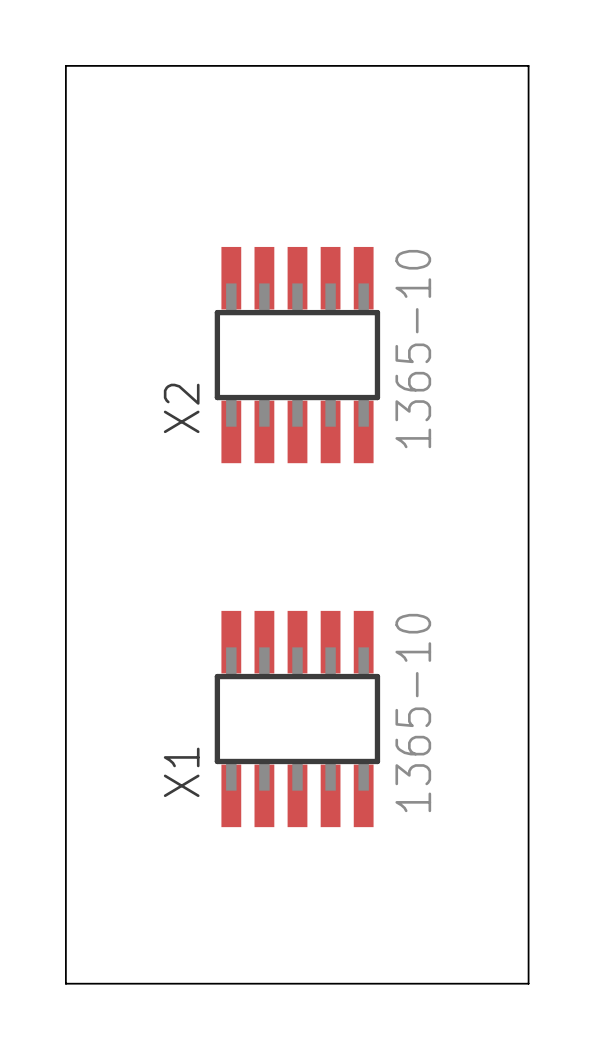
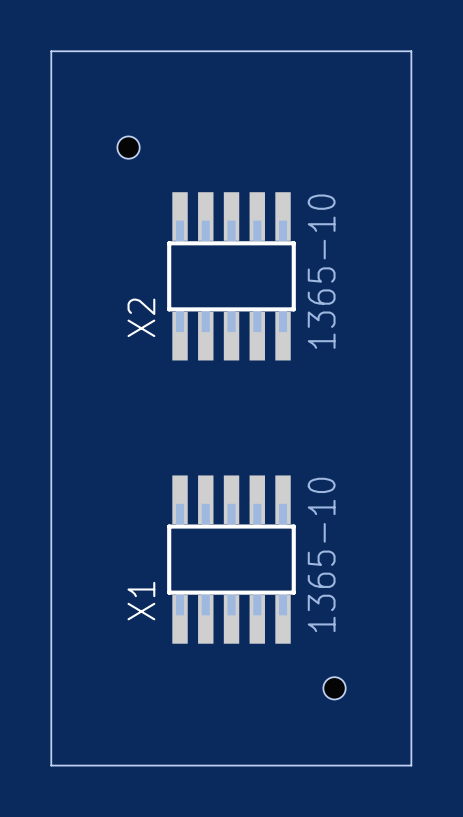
hole: none -> (128, 147)
hole: none -> (334, 688)

